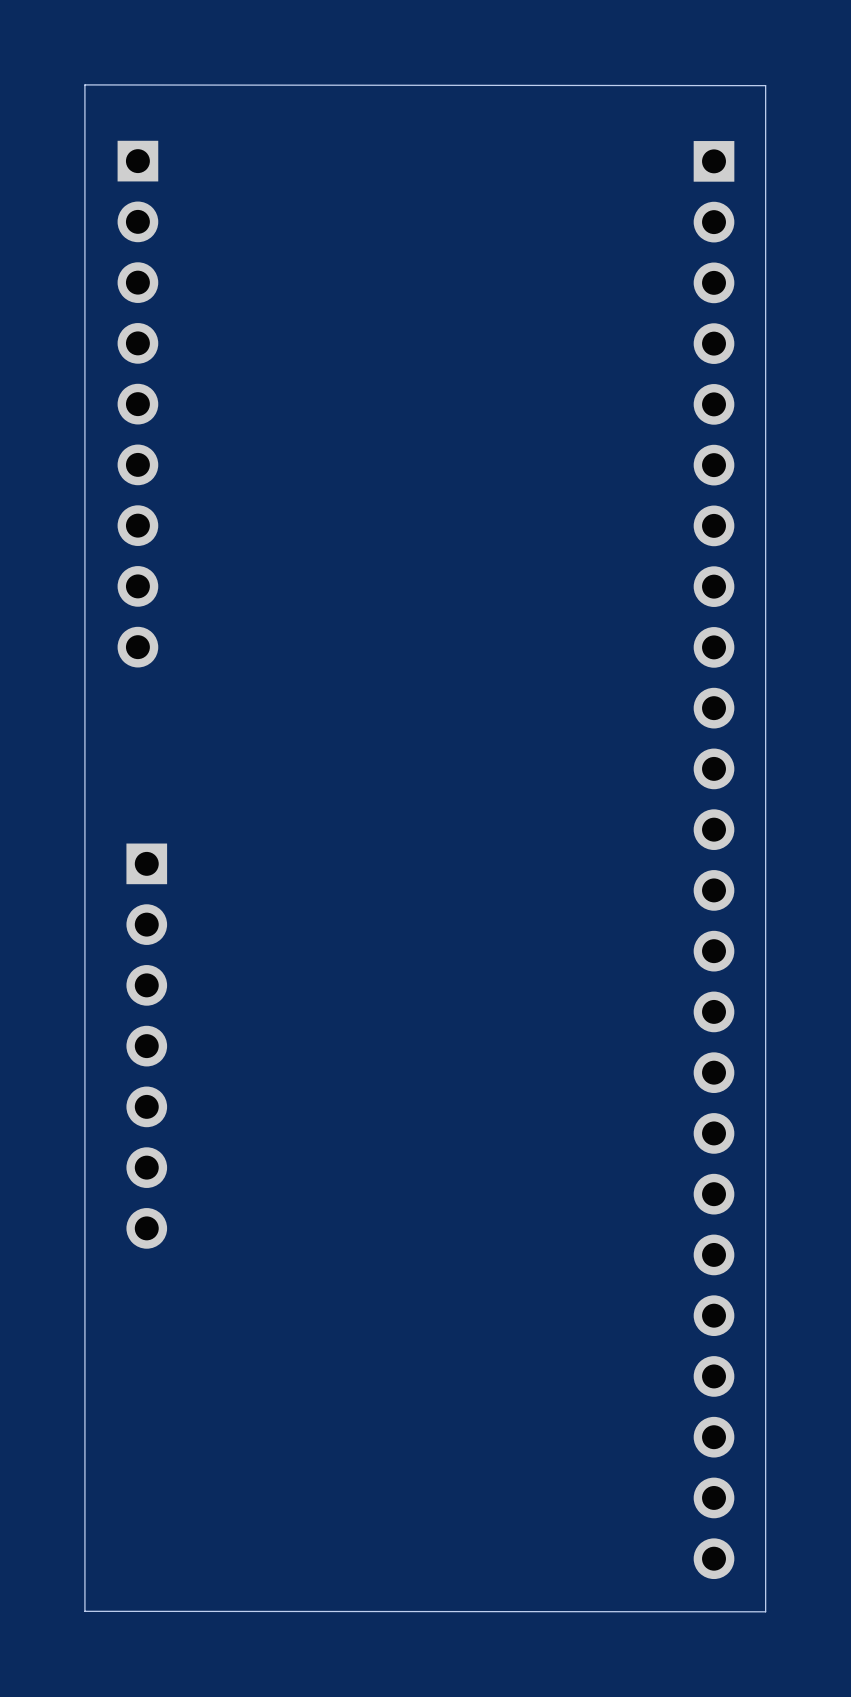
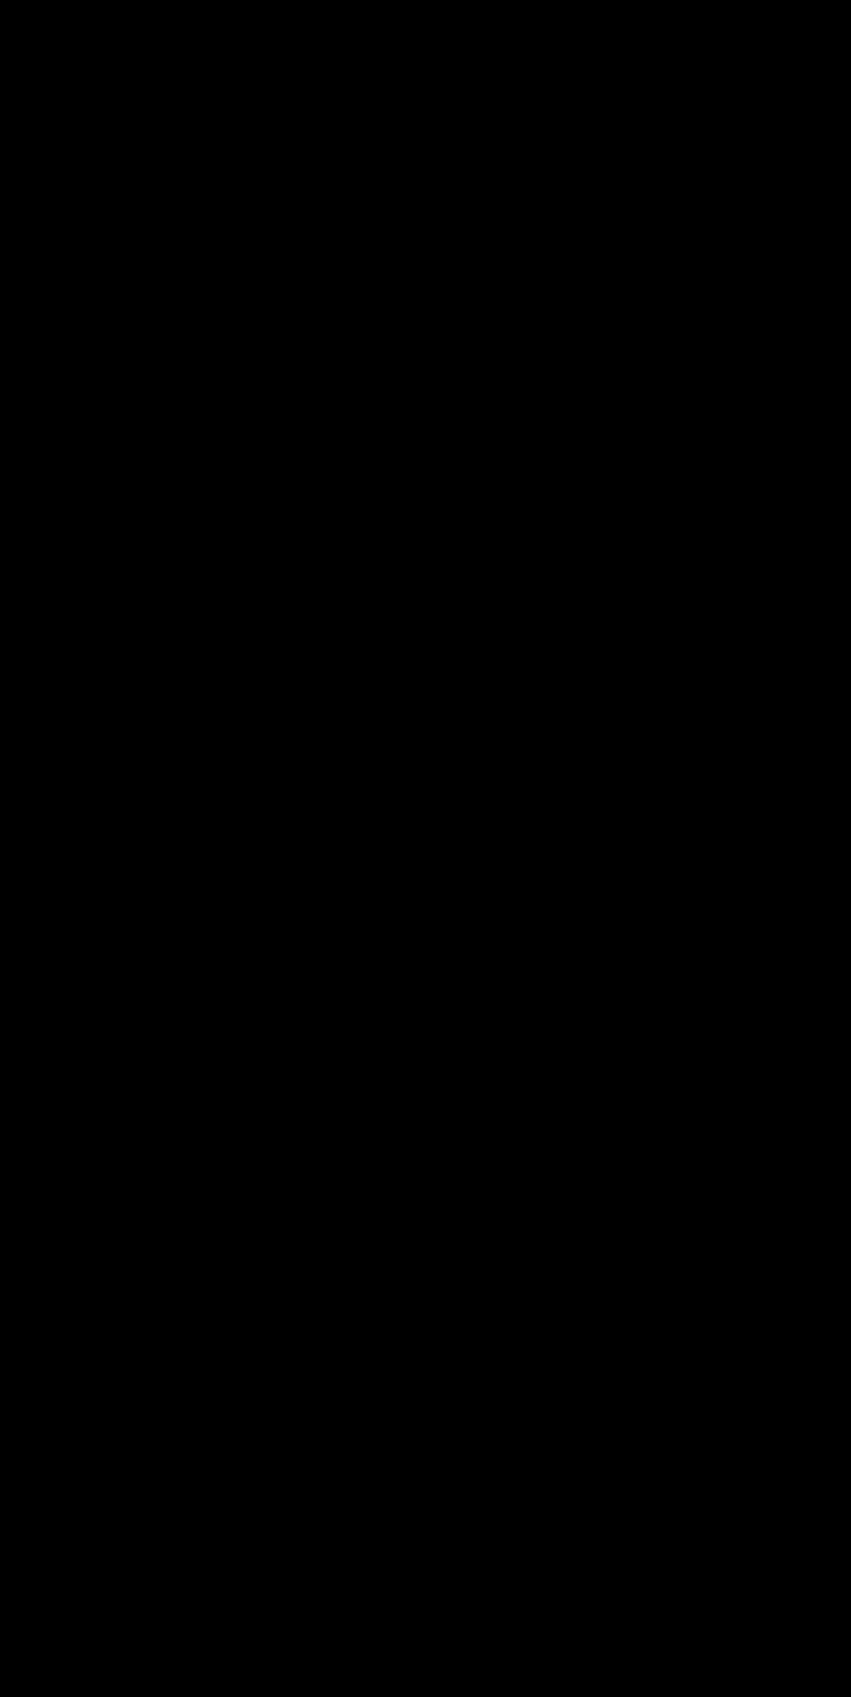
board edge: (84, 84) (765, 85) (765, 1611) (84, 1611) (84, 84) -> none
part: (137, 404) -> none
part: (714, 860) -> none
part: (146, 1046) -> none

